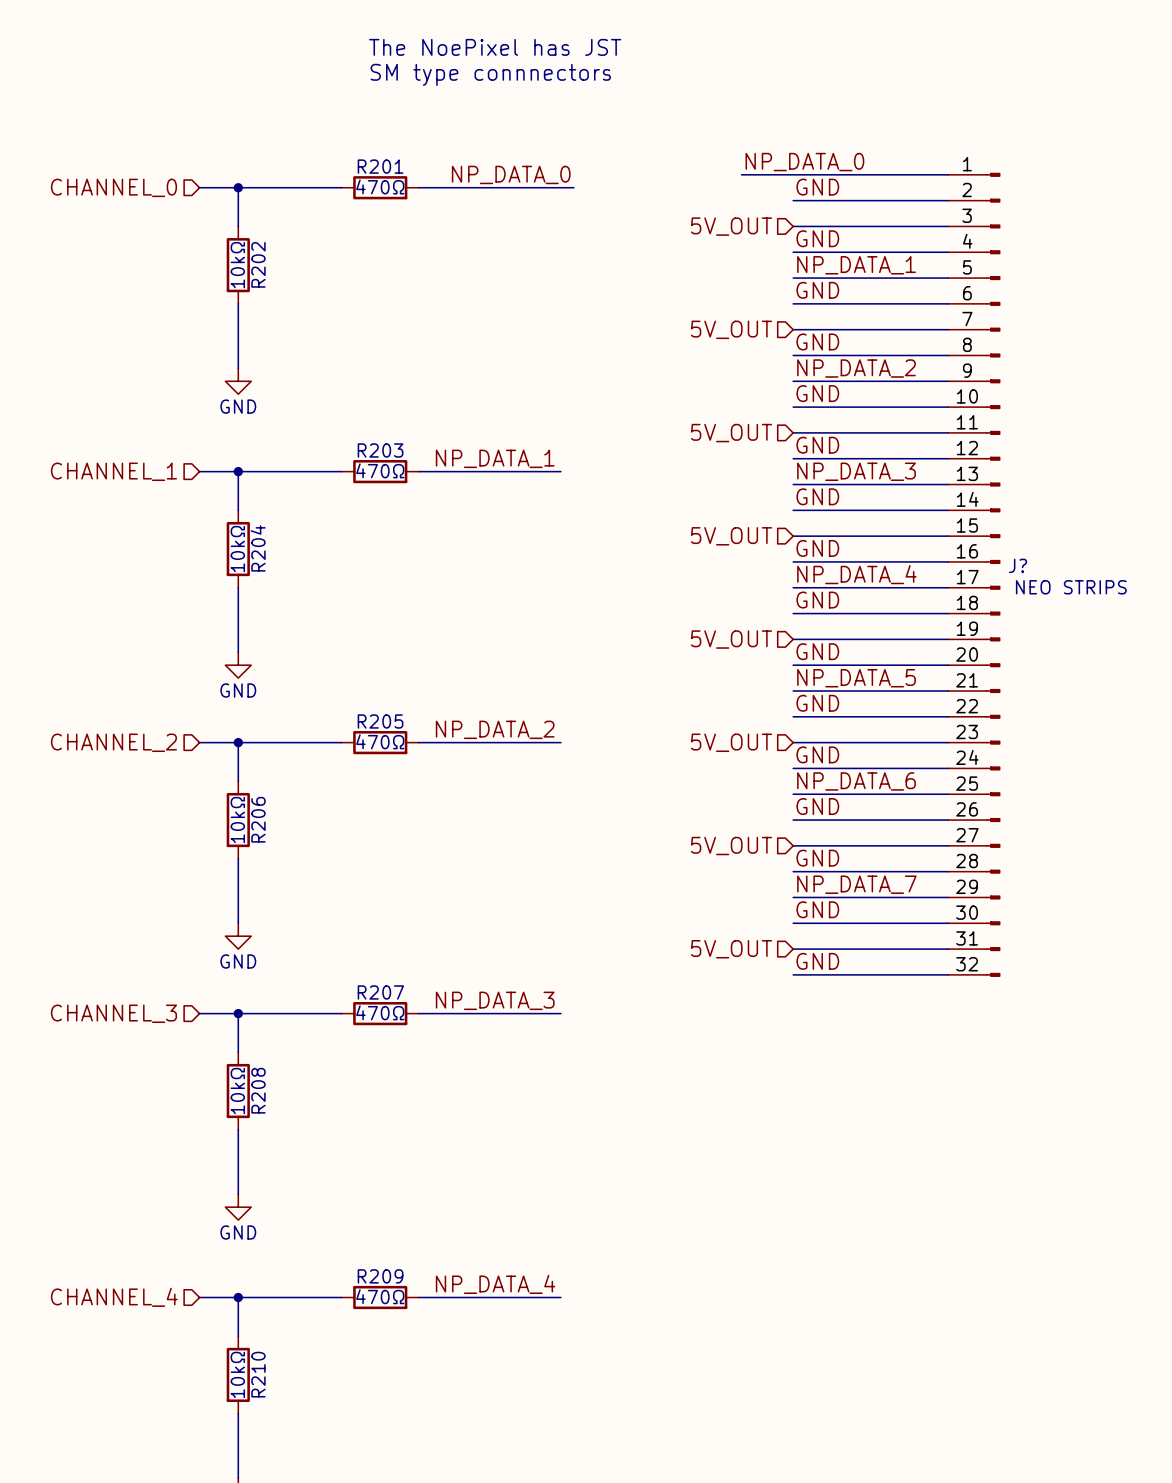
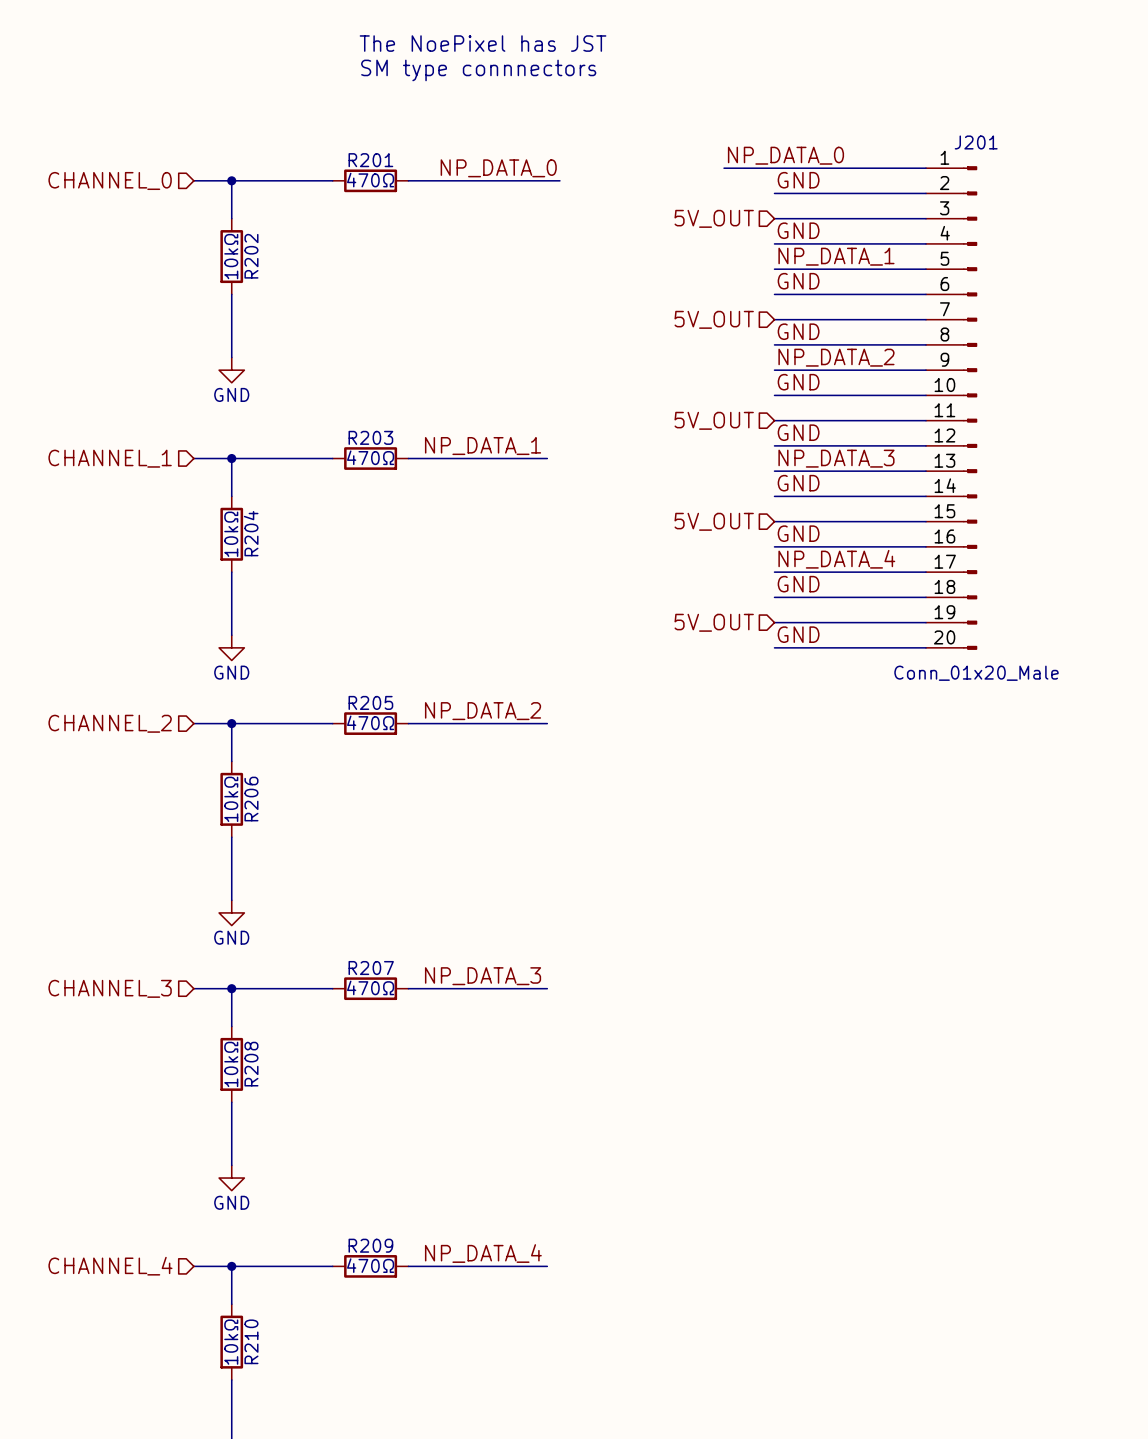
J201: none -> Conn_01x20_Male (951, 408)
J?: NEO STRIPS (974, 574) -> none
label: NP_DATA_5 (856, 678) -> none
wire: (793, 691) (948, 691) -> none
label: GND (817, 703) -> none
wire: (793, 716) (948, 716) -> none
hierarchical label: 5V_OUT (731, 742) -> none
wire: (793, 742) (948, 742) -> none
label: GND (817, 754) -> none
wire: (793, 768) (948, 768) -> none
label: NP_DATA_6 (856, 781) -> none
wire: (793, 794) (948, 794) -> none
label: GND (817, 806) -> none
wire: (793, 820) (948, 820) -> none
wire: (793, 845) (948, 845) -> none
hierarchical label: 5V_OUT (731, 846) -> none
label: GND (817, 858) -> none
wire: (793, 871) (948, 871) -> none
label: NP_DATA_7 (856, 884) -> none
wire: (793, 897) (948, 897) -> none
label: GND (817, 909) -> none
wire: (793, 923) (948, 923) -> none
hierarchical label: 5V_OUT (731, 949) -> none
wire: (793, 949) (948, 949) -> none
label: GND (817, 961) -> none
wire: (793, 974) (948, 974) -> none

